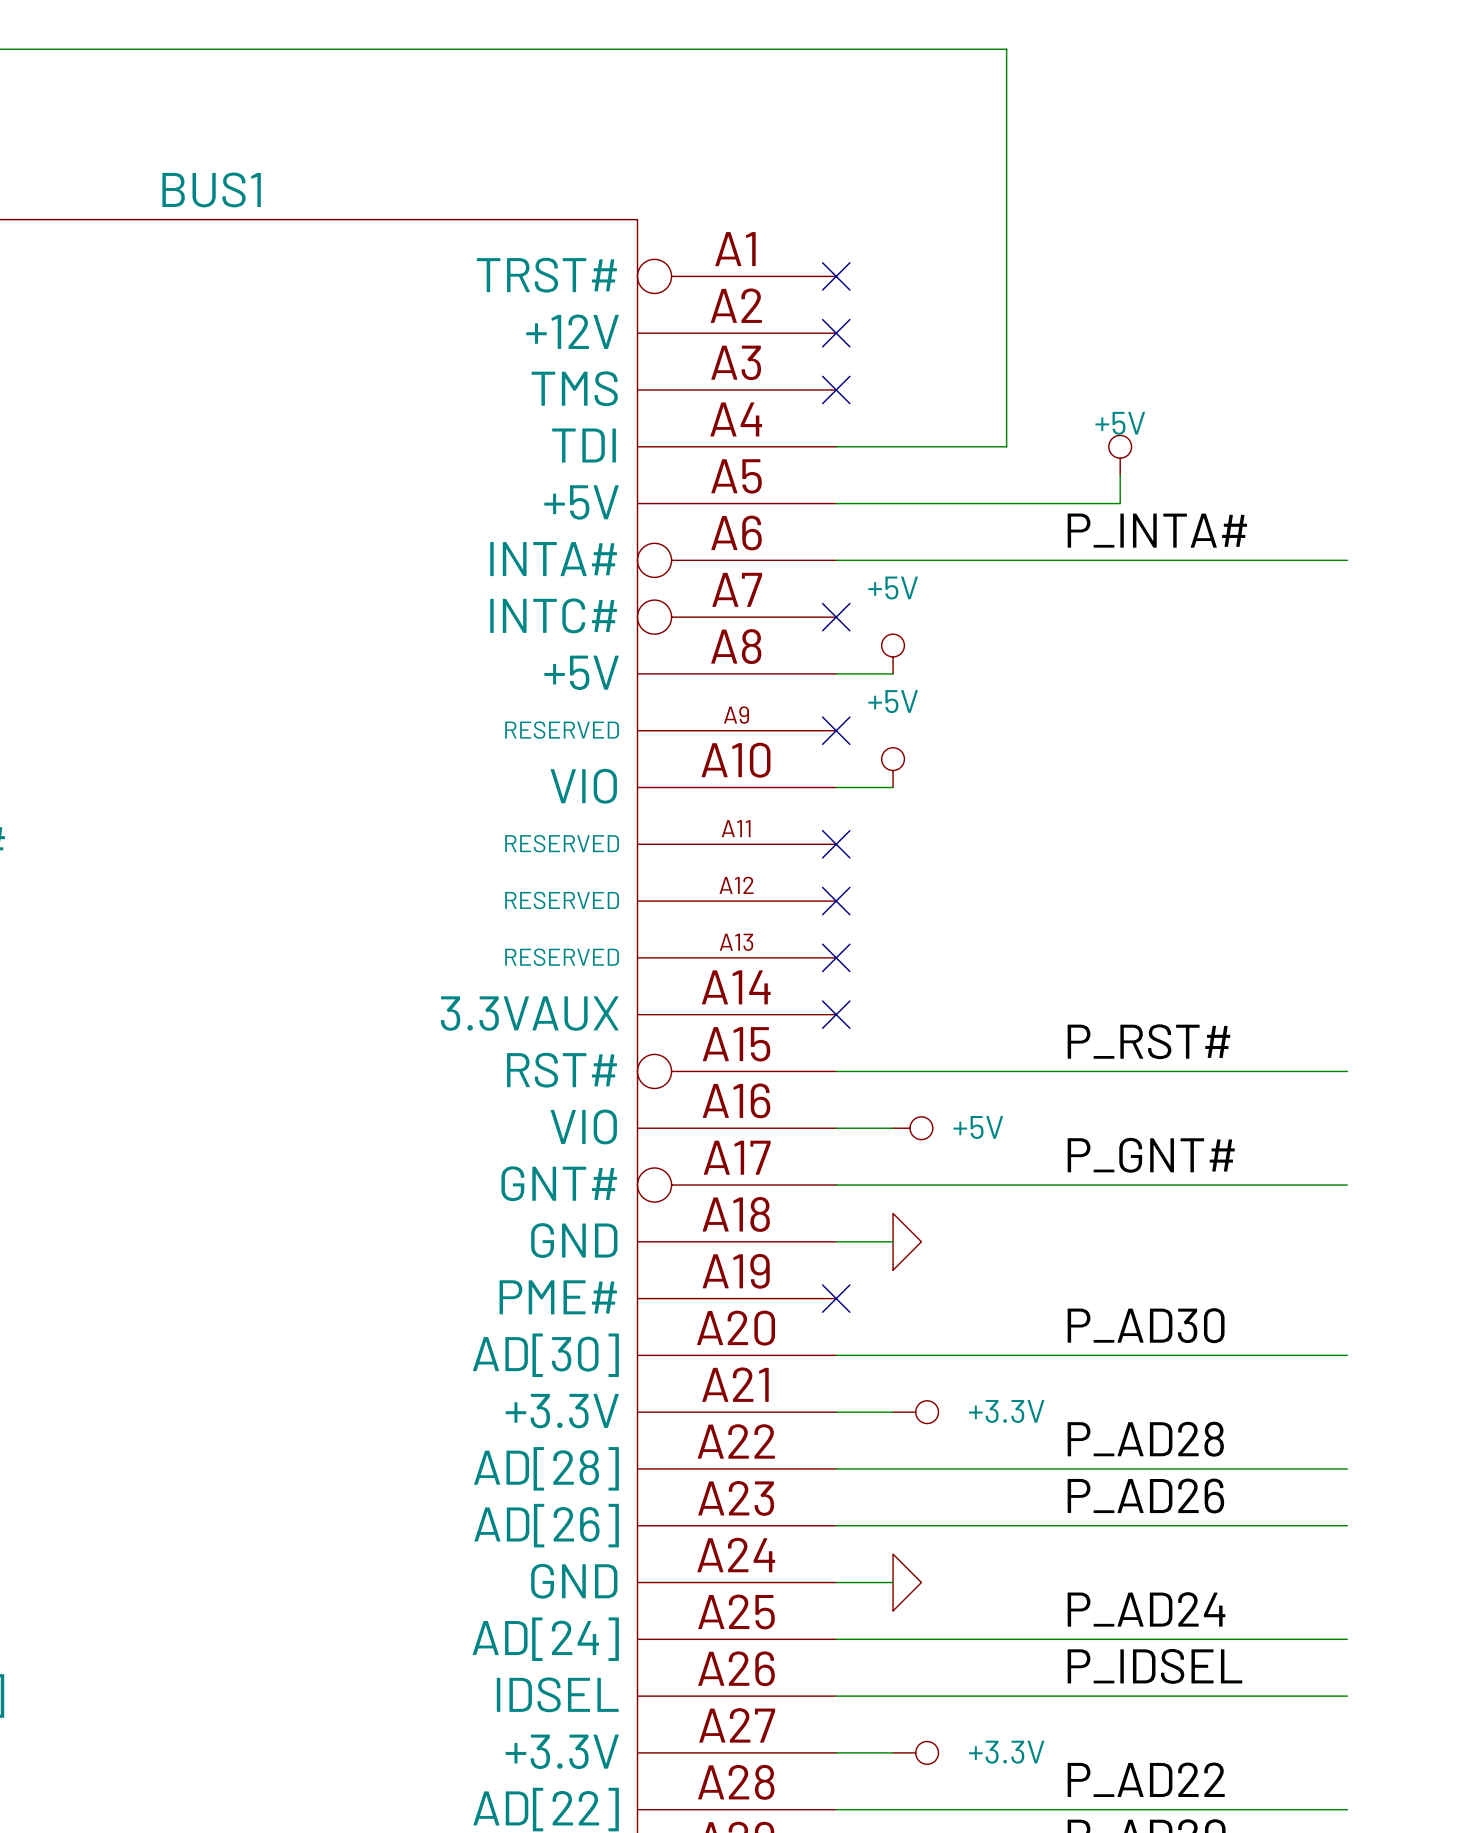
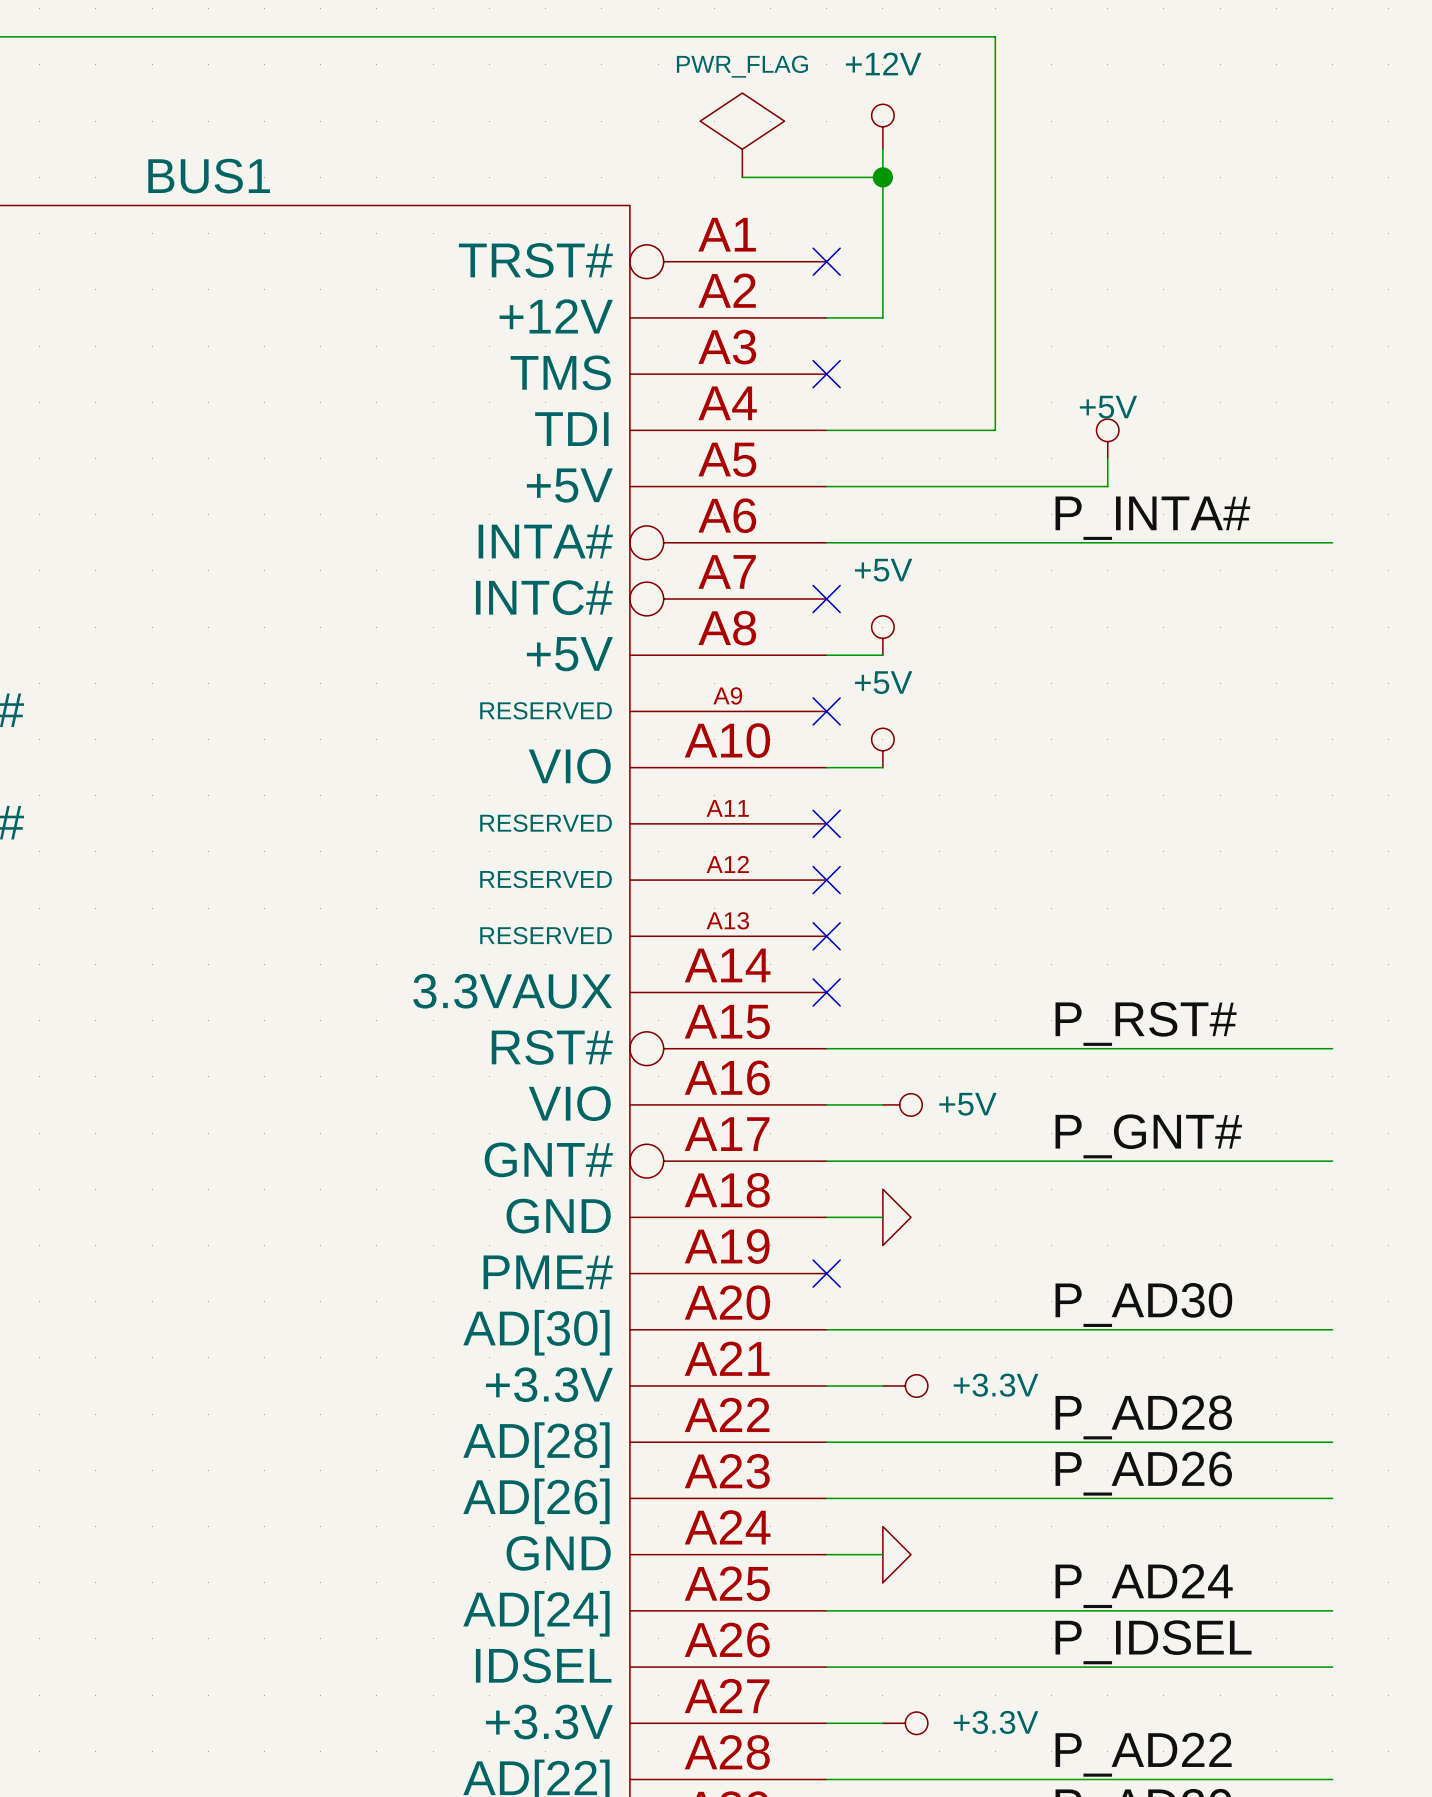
power symbol: none -> +12V (882, 126)
power symbol: none -> PWR_FLAG (742, 135)
wire: none -> (882, 149) (882, 317) (826, 317)
wire: none -> (742, 177) (882, 177)
junction: none -> (882, 177)
no-connect mark: (836, 333) -> none

